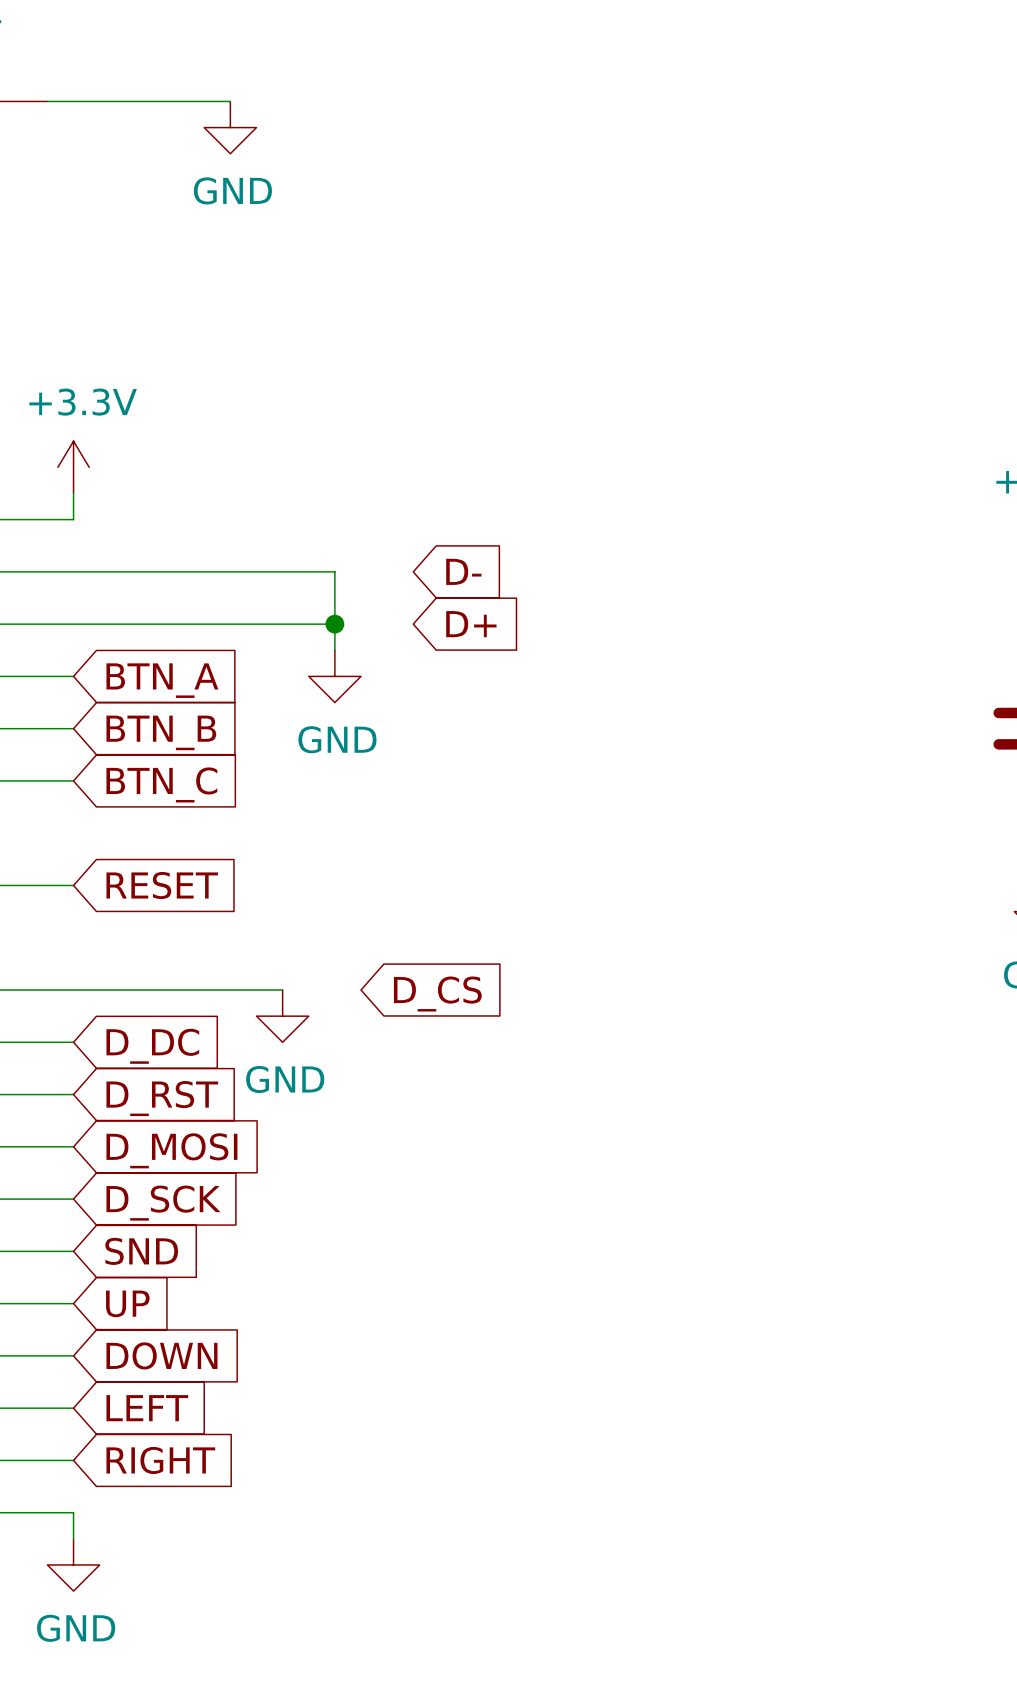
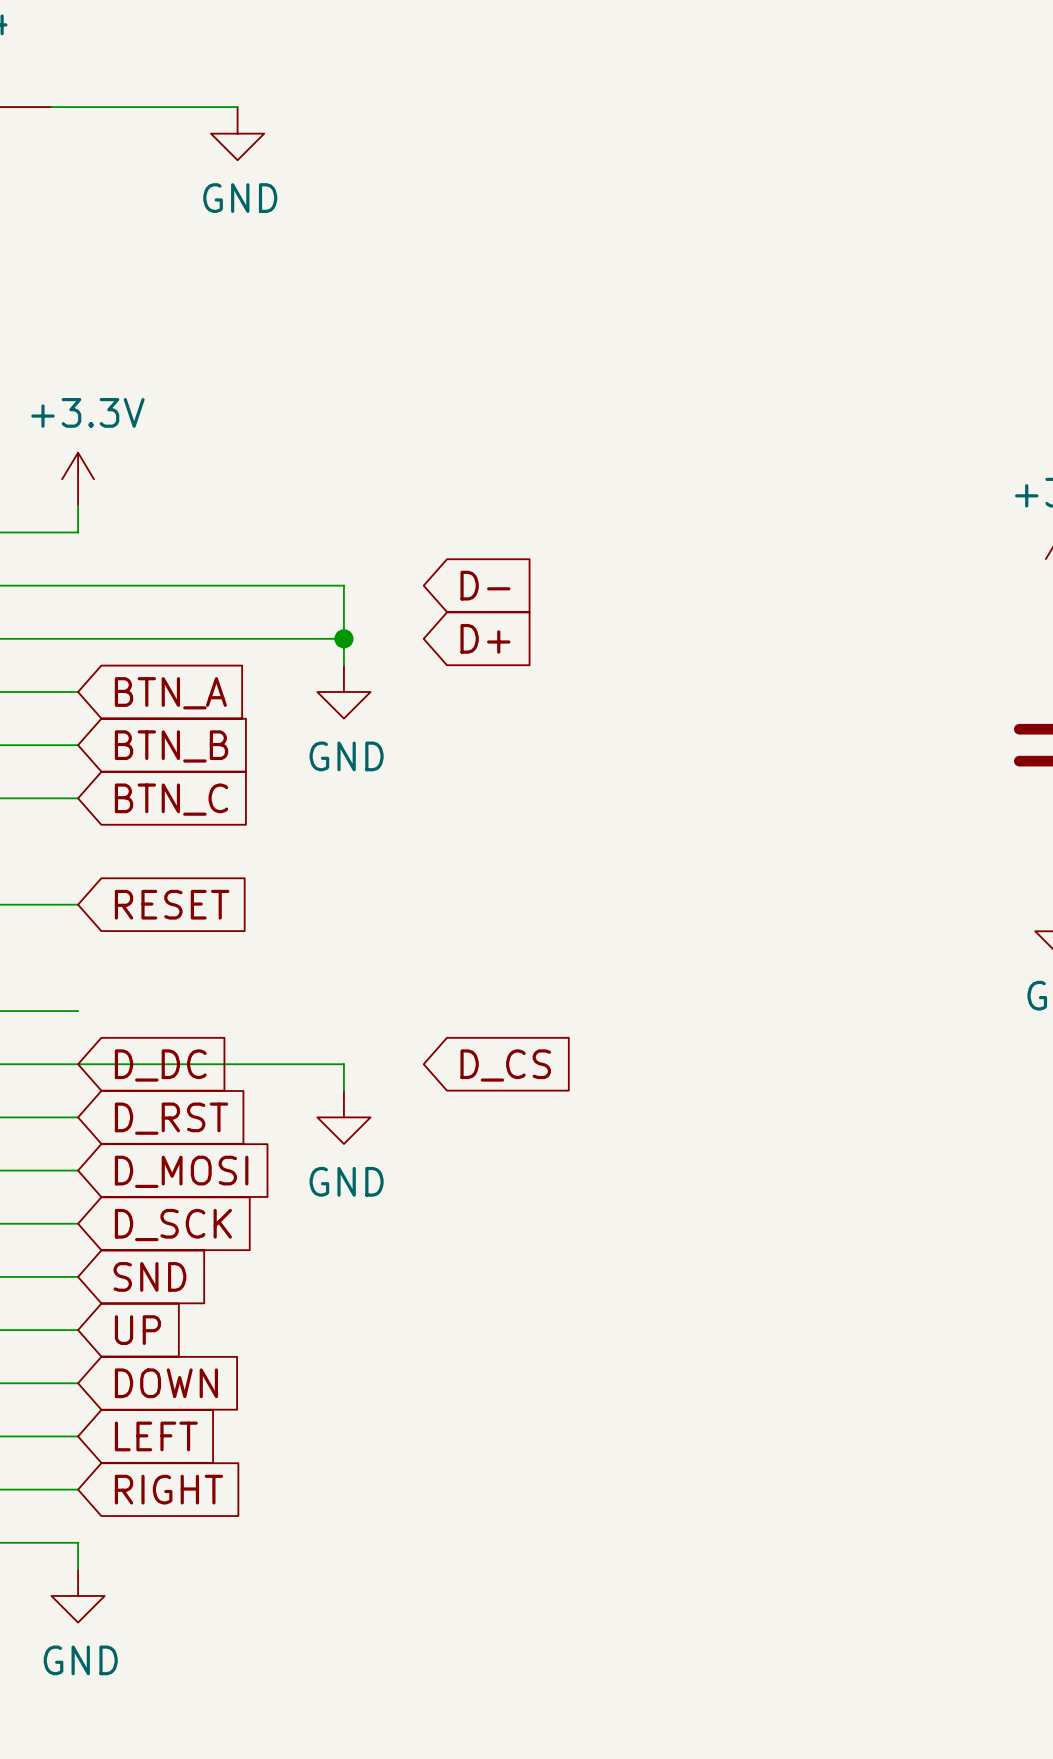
wire: (73, 990) (282, 990) -> none
global label position: D_CS (437, 994) -> D_CS (505, 1065)
power symbol position: GND (282, 1016) -> GND (343, 1117)
wire: none -> (78, 1064) (343, 1064) (343, 1090)

